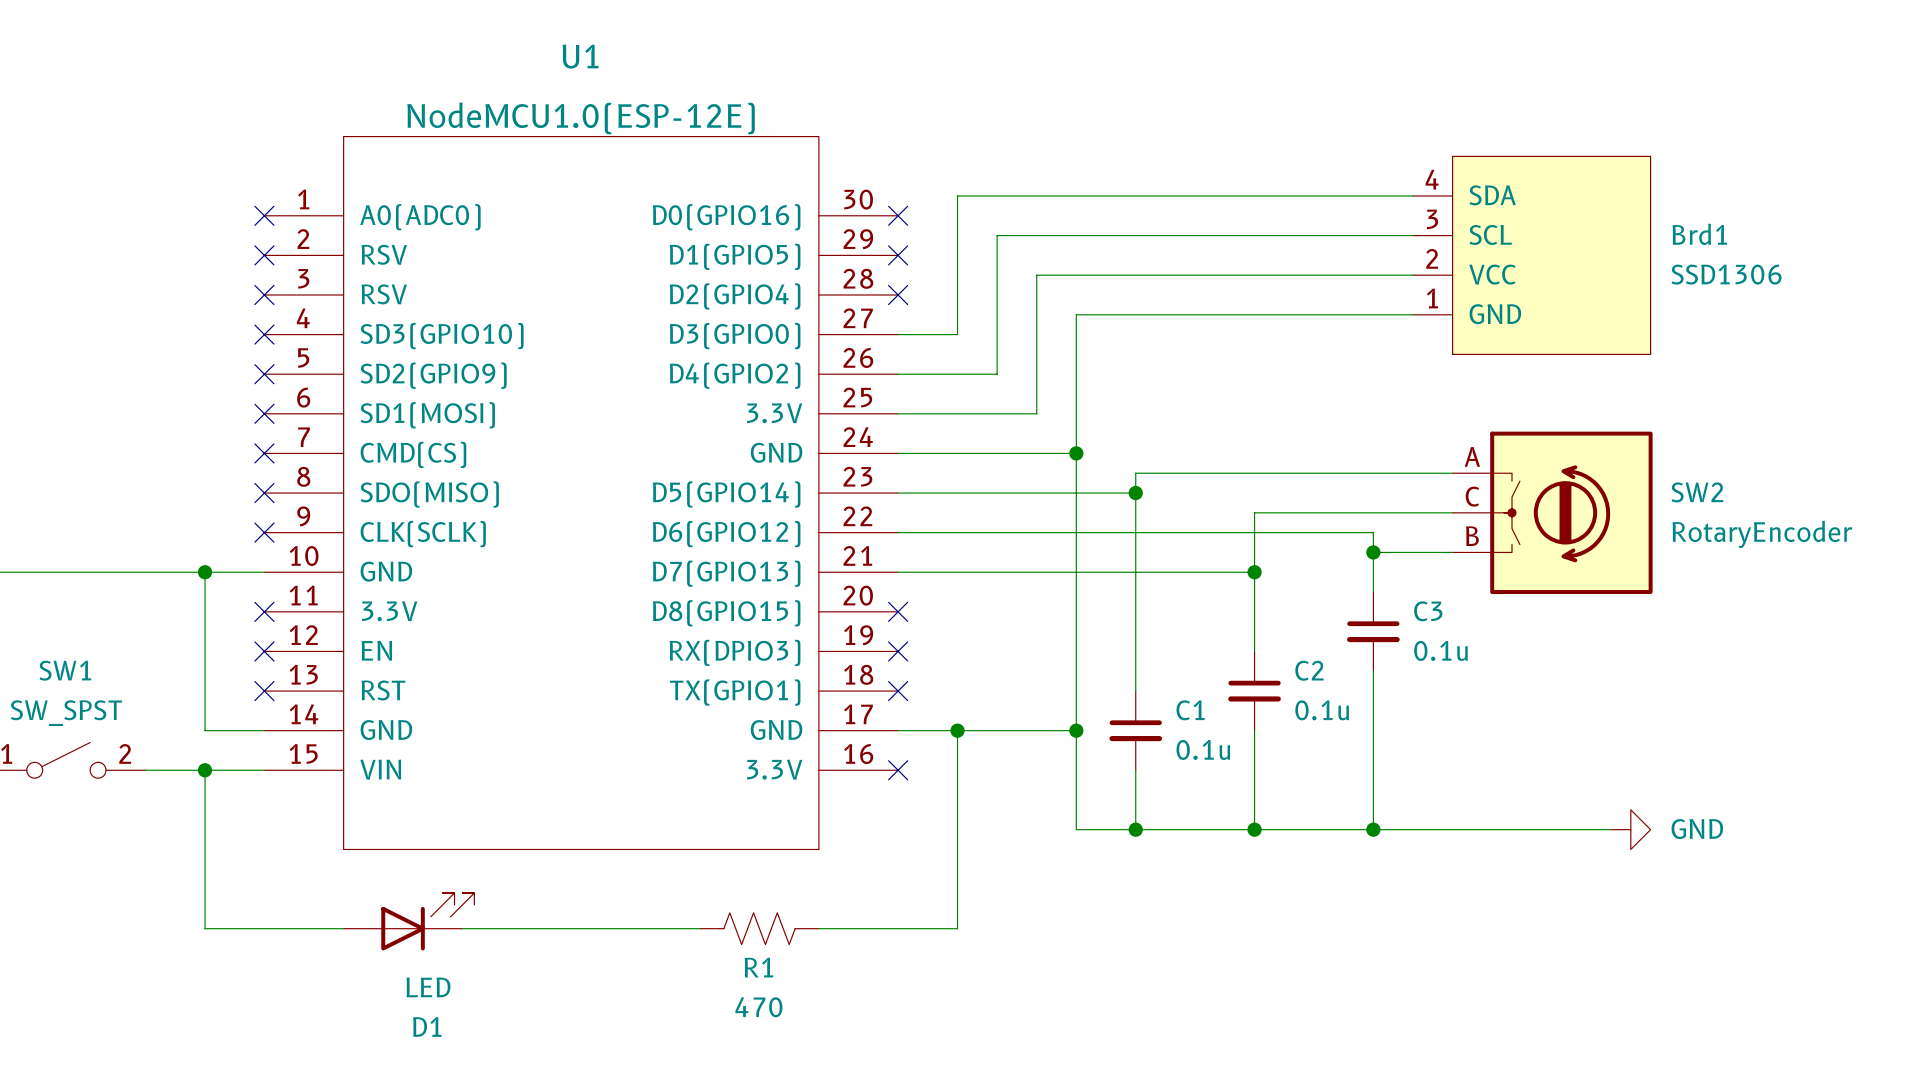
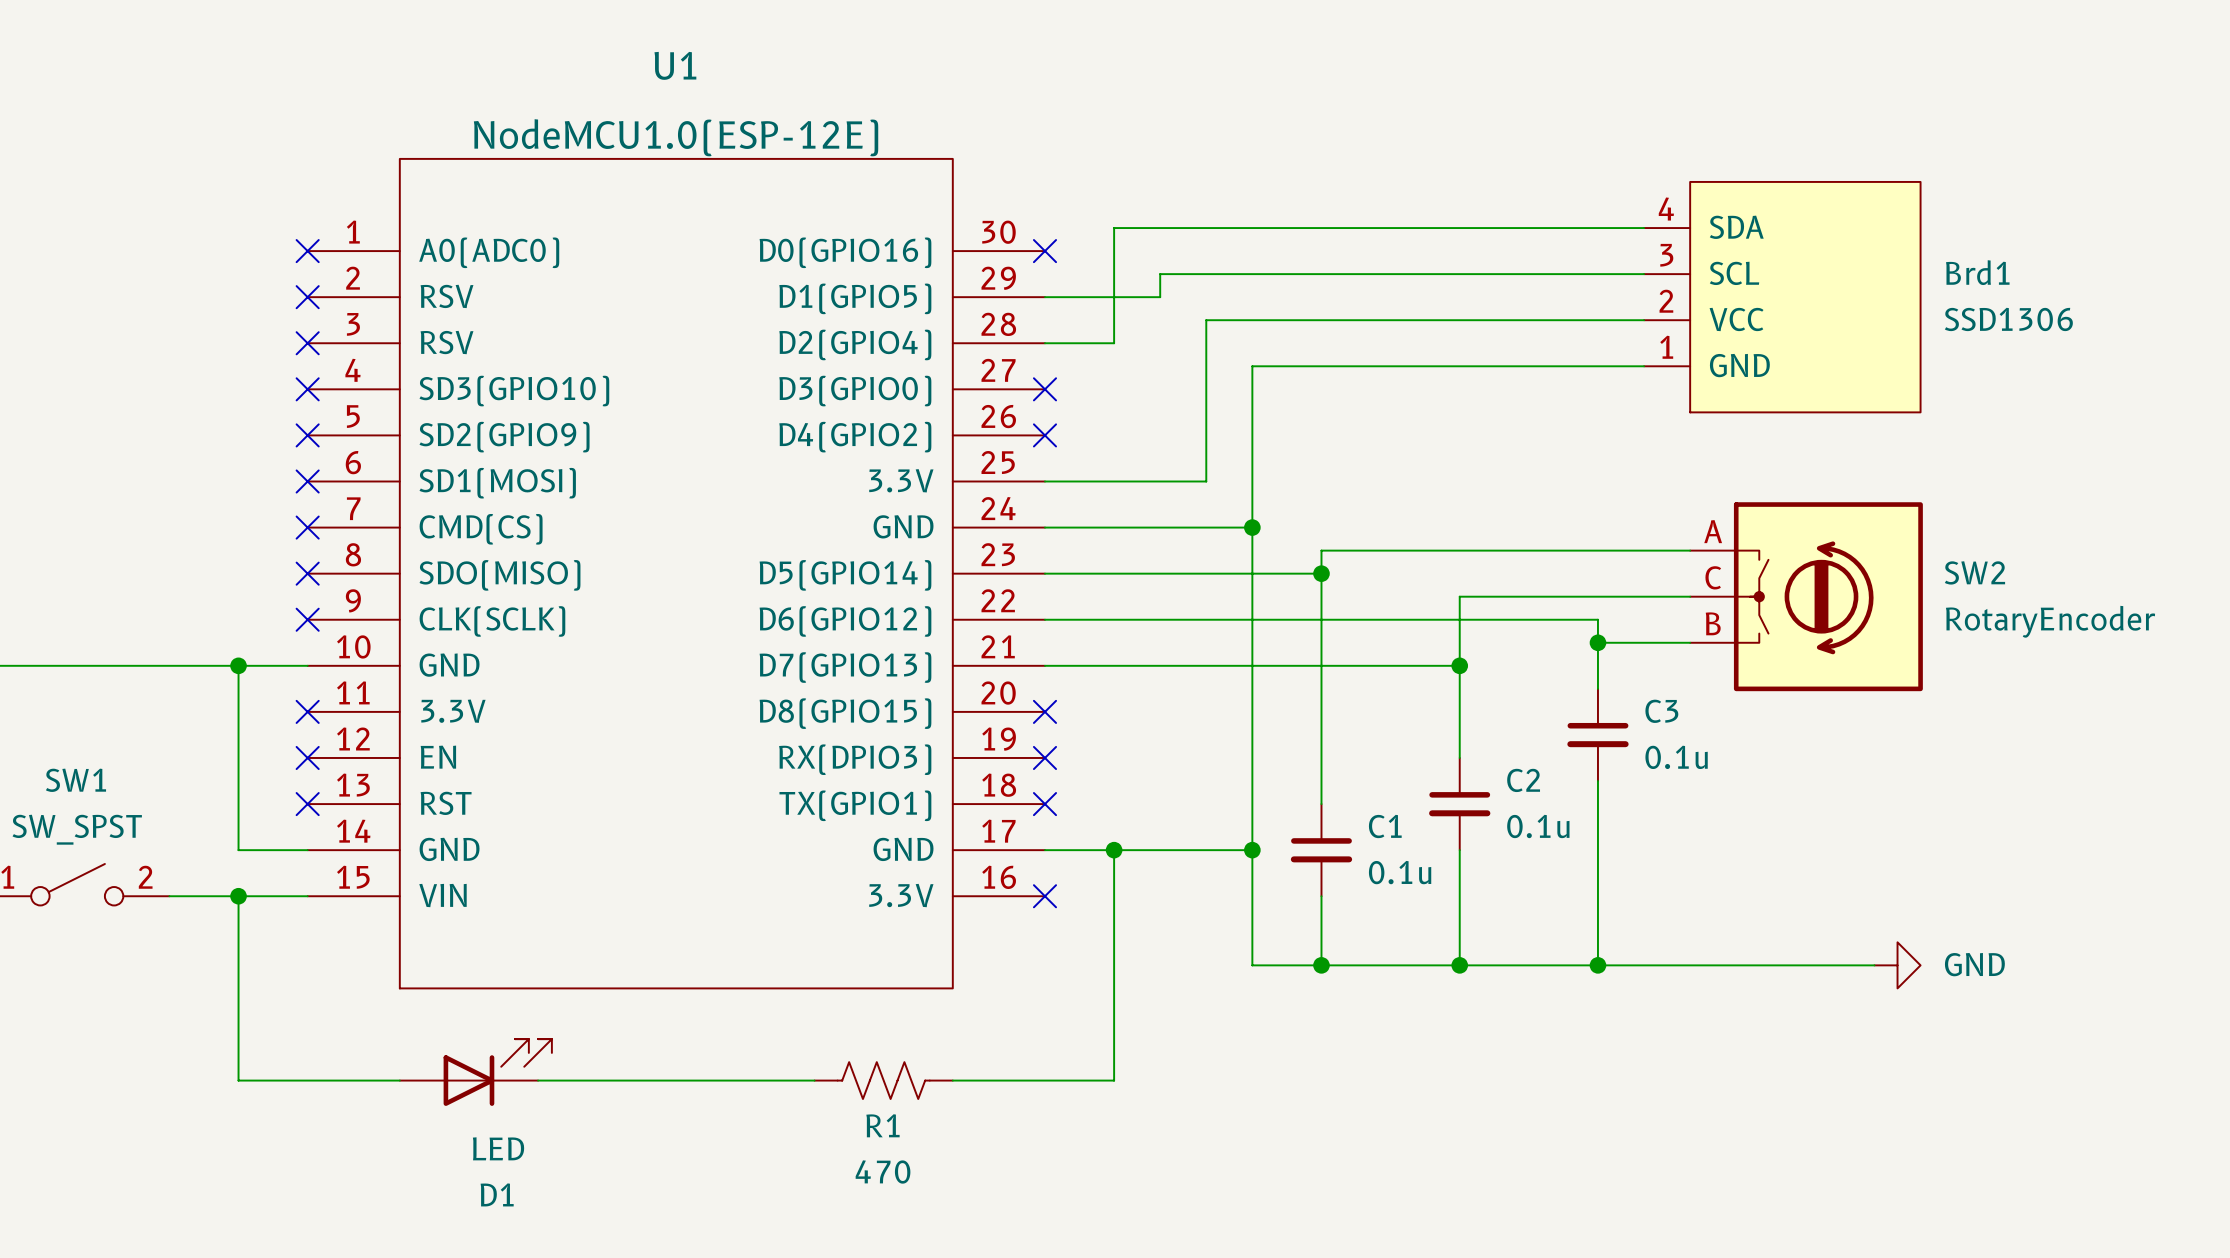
no-connect mark: (898, 255) -> none
wire: (997, 255) (997, 374) (898, 374) -> (1160, 297) (1044, 297)
no-connect mark: (898, 295) -> none
wire: (957, 295) (957, 334) (898, 334) -> (1114, 343) (1044, 343)
no-connect mark: none -> (1044, 389)
no-connect mark: none -> (1044, 435)

